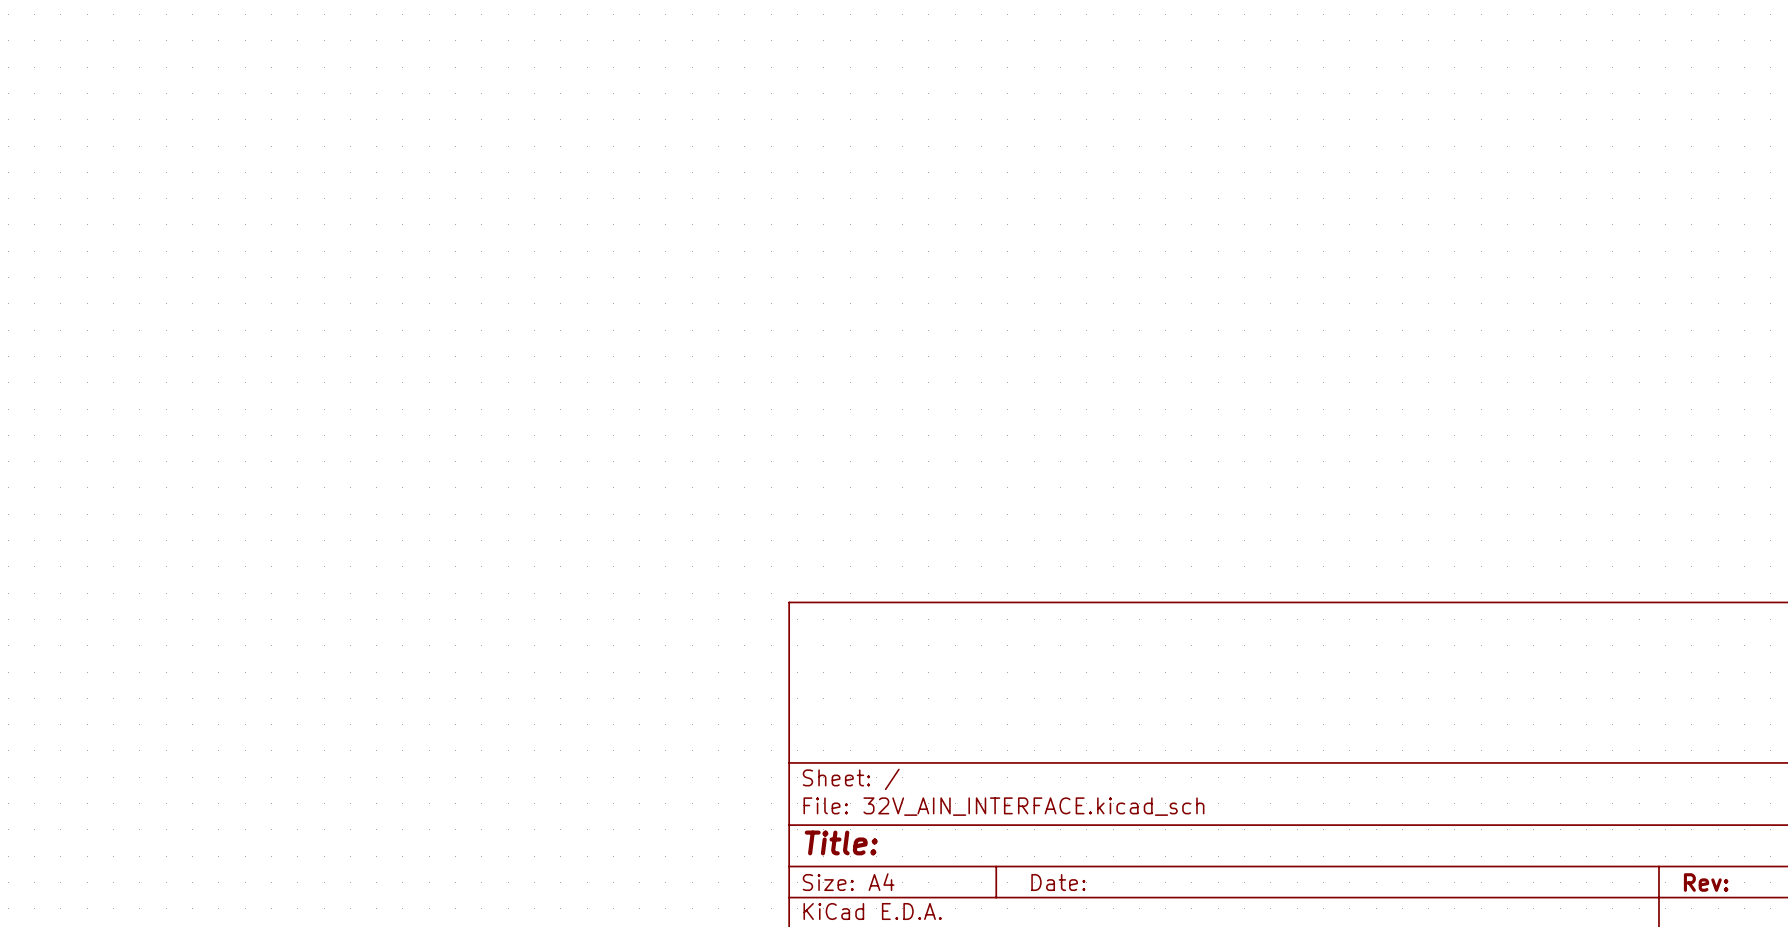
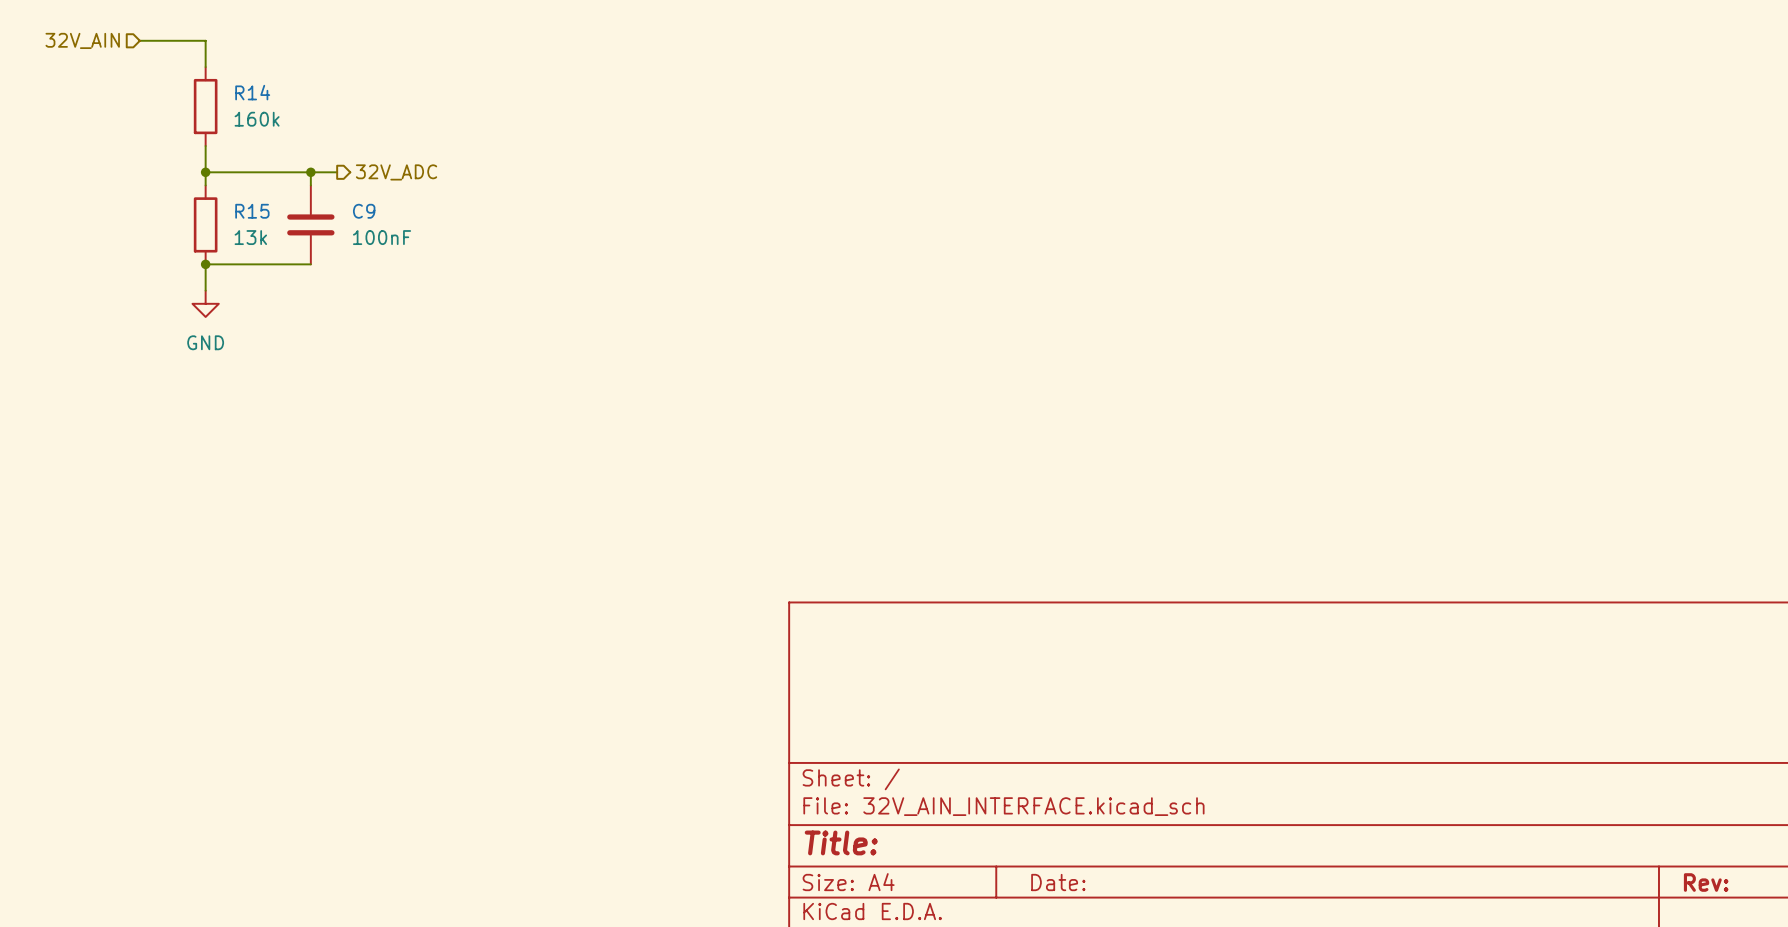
hierarchical label: none -> 32V_AIN (82, 40)
wire: none -> (139, 40) (205, 40) (205, 67)
R14: none -> 160k (205, 106)
wire: none -> (205, 146) (205, 185)
wire: none -> (205, 172) (337, 172)
junction: none -> (205, 172)
wire: none -> (310, 172) (310, 185)
junction: none -> (310, 172)
hierarchical label: none -> 32V_ADC (396, 172)
R15: none -> 13k (205, 224)
C9: none -> 100nF (310, 224)
junction: none -> (205, 264)
wire: none -> (310, 264) (205, 264) (205, 290)
power symbol: none -> GND (205, 303)

